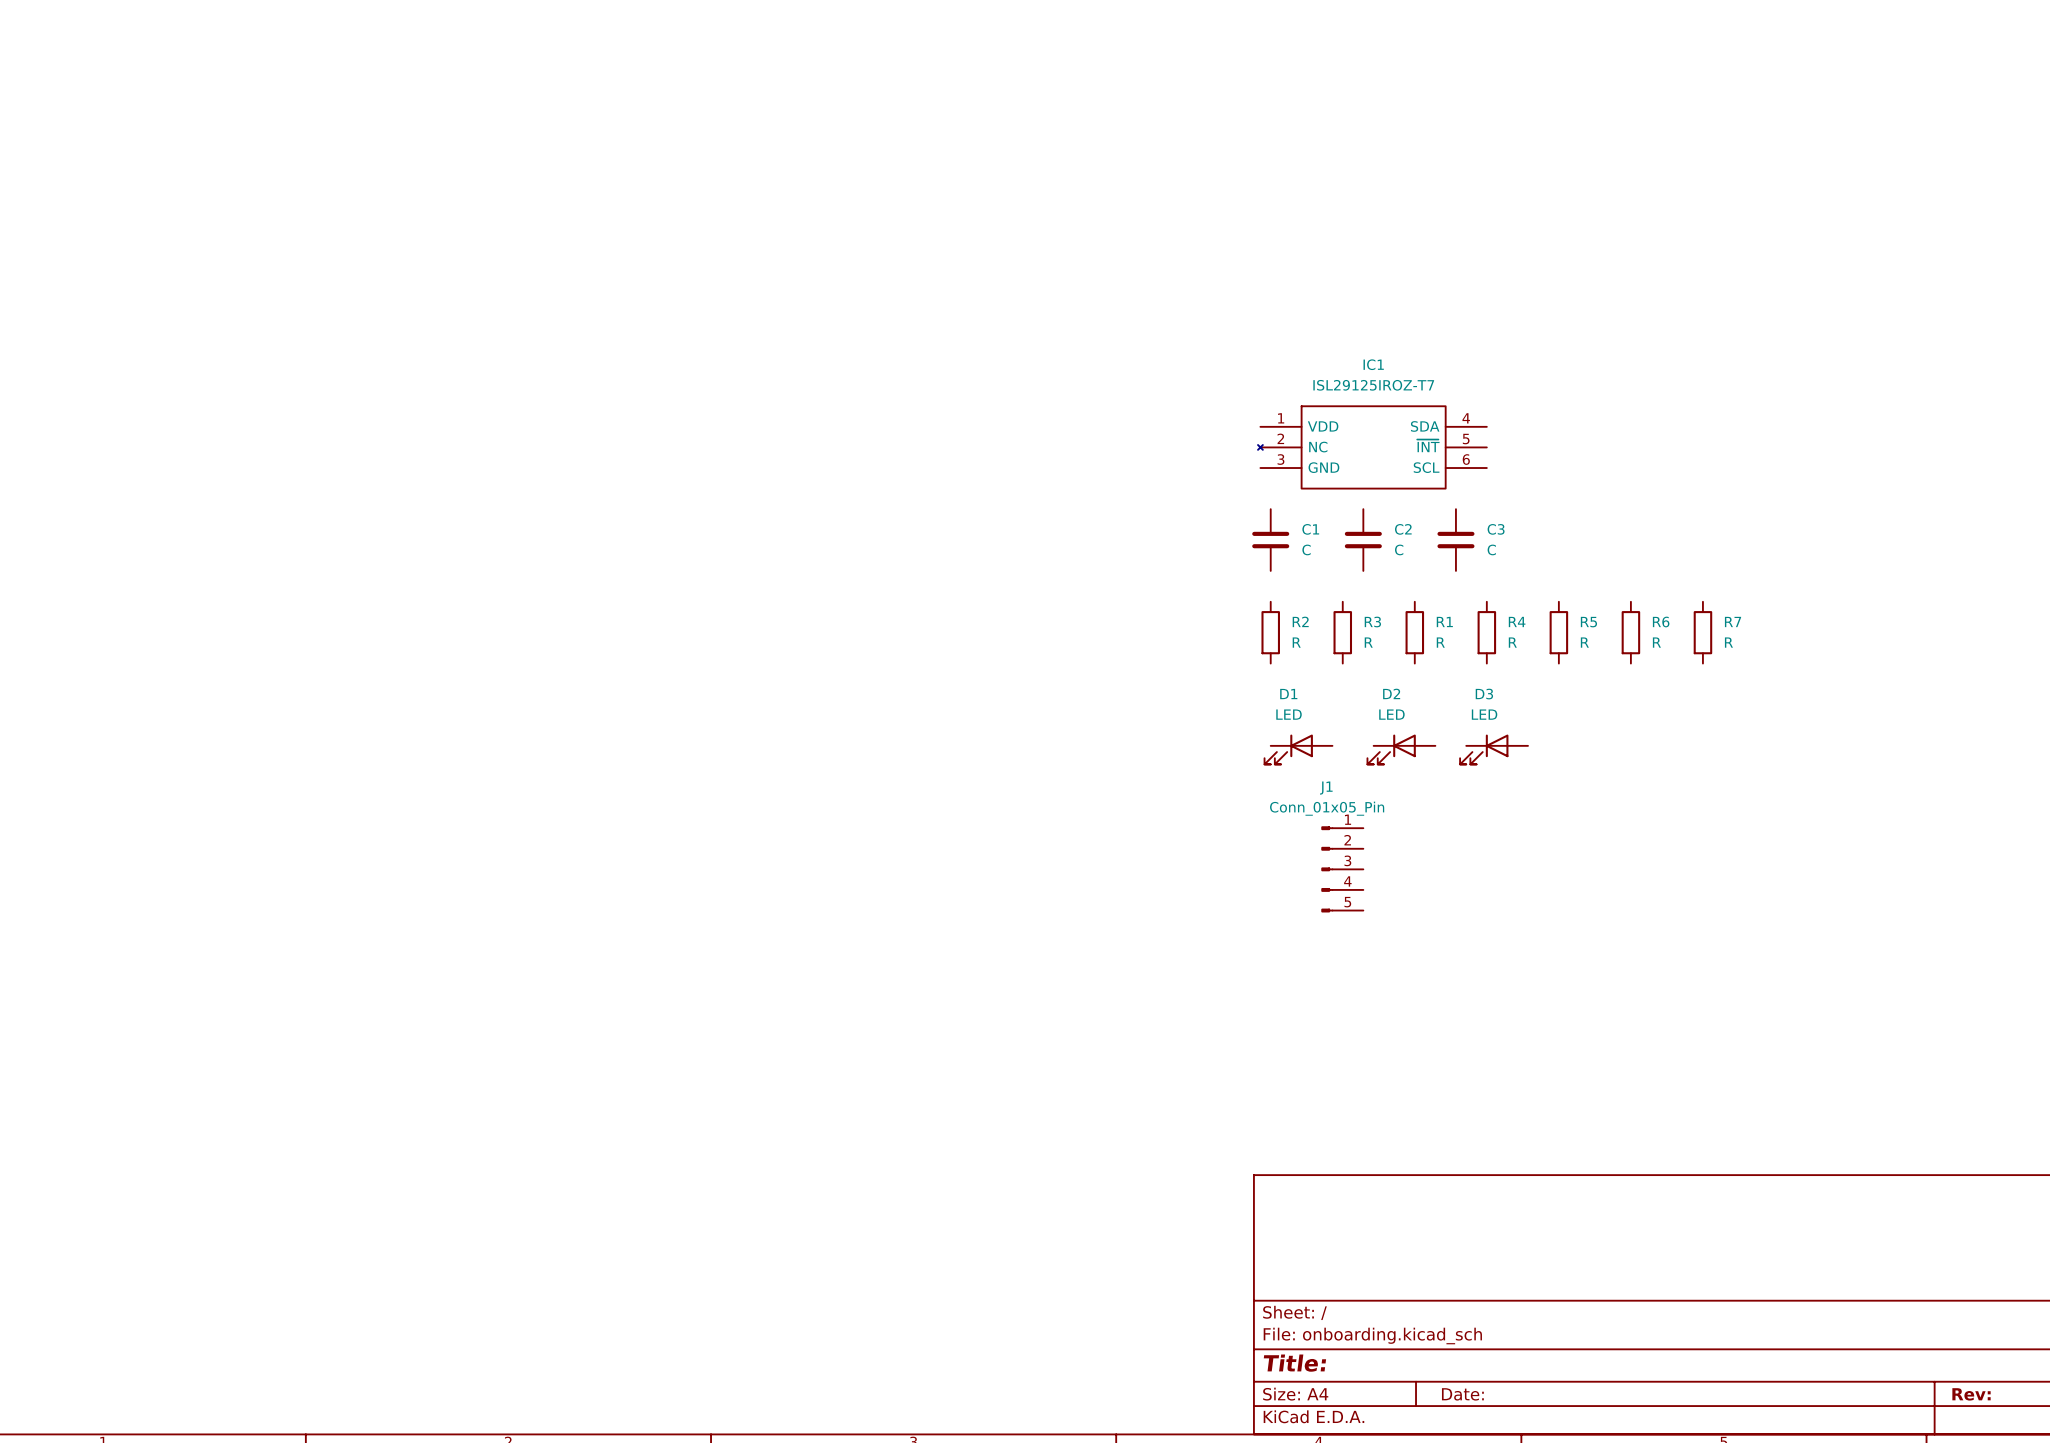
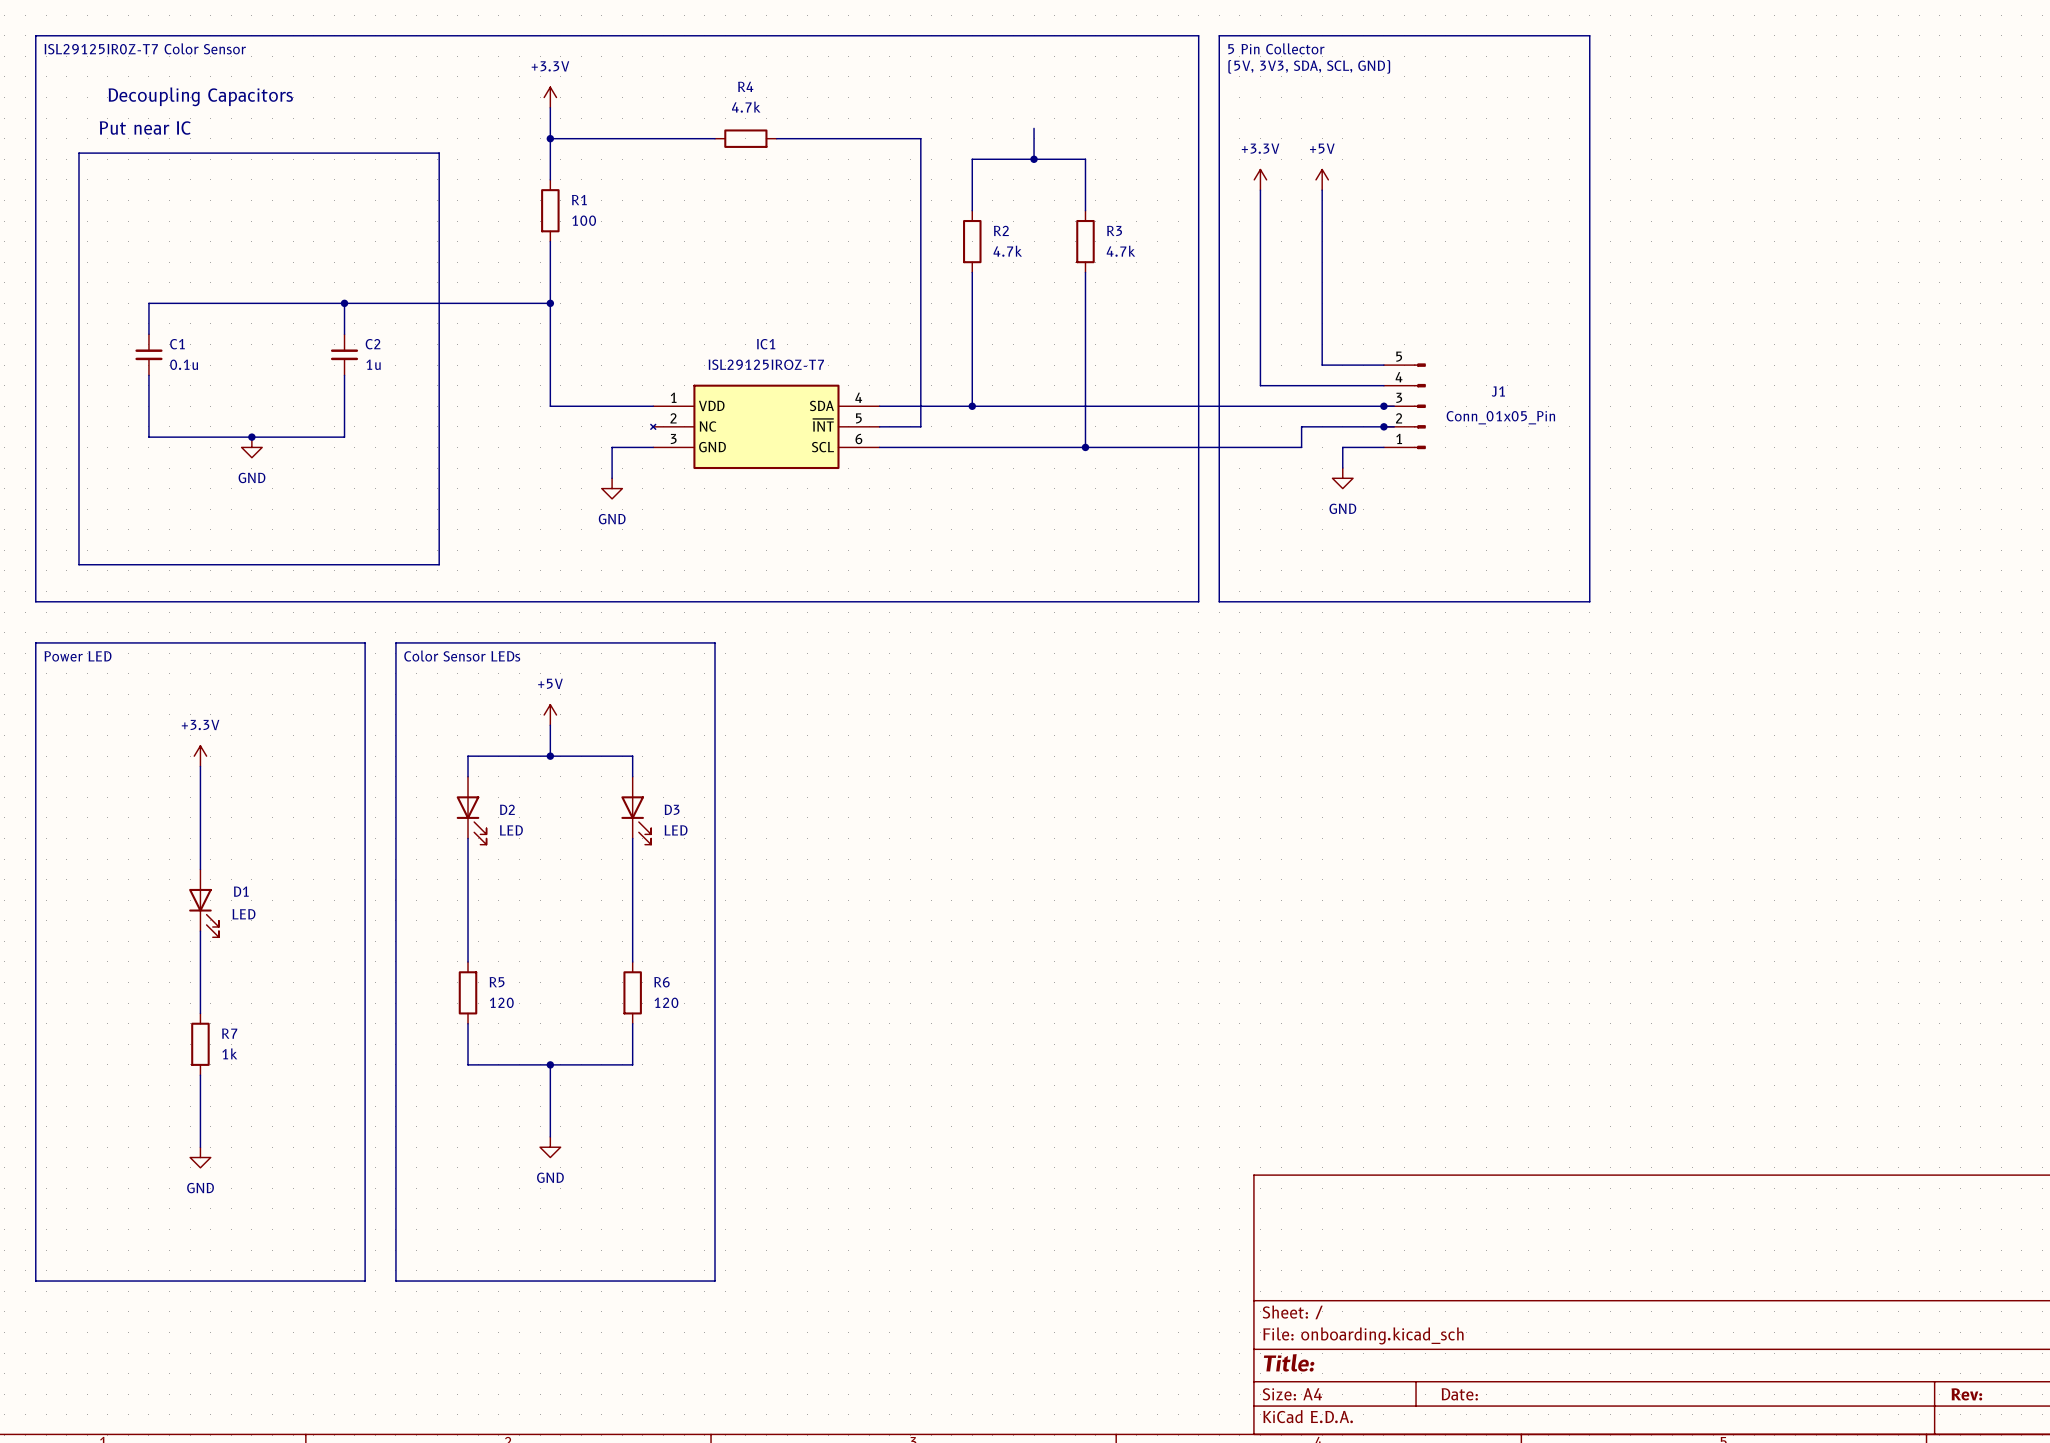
line: none -> (35, 35) (35, 601) (1198, 601) (1198, 35) (35, 35)
line: none -> (1219, 35) (1589, 35) (1589, 601) (1219, 601) (1219, 35)
text: none -> ISL29125IR0Z-T7 Color Sensor (145, 48)
text: none -> 5 Pin Collector (1276, 48)
text: none -> (5V, 3V3, SDA, SCL, GND) (1309, 66)
text: none -> Decoupling Capacitors (200, 96)
power symbol: none -> +3.3V (550, 97)
wire: none -> (550, 107) (550, 179)
text: none -> Put near IC (145, 128)
wire: none -> (1034, 128) (1034, 159)
wire: none -> (550, 138) (714, 138)
junction: none -> (550, 138)
wire: none -> (776, 138) (920, 138) (920, 426) (879, 426)
line: none -> (79, 153) (439, 153) (439, 564) (79, 564) (79, 153)
junction: none -> (1034, 159)
power symbol: none -> +3.3V (1260, 179)
power symbol: none -> +5V (1322, 179)
wire: none -> (1260, 190) (1260, 385) (1383, 385)
wire: none -> (1322, 190) (1322, 365) (1383, 365)
wire: none -> (972, 210) (972, 159) (1085, 159) (1085, 210)
wire: none -> (550, 241) (550, 406) (653, 406)
wire: none -> (972, 272) (972, 406)
wire: none -> (1085, 272) (1085, 447)
wire: none -> (344, 303) (344, 334)
junction: none -> (344, 303)
wire: none -> (550, 303) (148, 303) (148, 334)
junction: none -> (550, 303)
wire: none -> (148, 375) (148, 437) (344, 437) (344, 375)
IC1 symbol: [1258, 405, 1487, 490] -> [650, 384, 880, 470]
wire: none -> (879, 406) (1394, 406)
junction: none -> (972, 406)
junction: none -> (1383, 406)
junction: none -> (1383, 426)
wire: none -> (1394, 426) (1301, 426) (1301, 447) (879, 447)
junction: none -> (251, 437)
power symbol: none -> GND (251, 447)
wire: none -> (653, 447) (612, 447) (612, 478)
junction: none -> (1085, 447)
wire: none -> (1383, 447) (1342, 447) (1342, 468)
power symbol: none -> GND (1342, 478)
power symbol: none -> GND (612, 488)
C1 symbol: [1252, 509, 1290, 571] -> [135, 334, 163, 376]
C2 symbol: [1344, 509, 1382, 571] -> [330, 334, 359, 376]
C3: C (1455, 540) -> none
C1 value: C (1306, 549) -> 0.1u (184, 364)
C2 value: C (1399, 549) -> 1u (373, 364)
R4 name position: R4 (1517, 621) -> R4 (745, 86)
R2 position: (1270, 632) -> (972, 241)
R3 position: (1342, 632) -> (1085, 241)
R1 position: (1414, 632) -> (550, 210)
R4 rotation: 0° (1486, 632) -> 90° clockwise (745, 138)
R4 position: (1486, 632) -> (745, 138)
R5 position: (1558, 632) -> (468, 992)
R6 position: (1630, 632) -> (632, 992)
R7 position: (1702, 632) -> (200, 1044)
line: none -> (35, 642) (365, 642) (365, 1281) (35, 1281) (35, 642)
line: none -> (395, 642) (714, 642) (714, 1281) (395, 1281) (395, 642)
R2 value: R (1296, 642) -> 4.7k (1007, 251)
R3 value: R (1368, 642) -> 4.7k (1120, 251)
R1 value: R (1440, 642) -> 100 (584, 220)
R4 value: R (1512, 642) -> 4.7k (746, 107)
R5 value: R (1584, 642) -> 120 (501, 1002)
R6 value: R (1656, 642) -> 120 (666, 1002)
R7 value: R (1728, 642) -> 1k (229, 1053)
text: none -> Power LED (78, 656)
text: none -> Color Sensor LEDs (462, 656)
D2 name position: D2 (1391, 693) -> D2 (507, 809)
D1 name position: D1 (1288, 694) -> D1 (241, 891)
D3 name position: D3 (1484, 694) -> D3 (672, 809)
power symbol: none -> +5V (550, 714)
D1 value position: LED (1289, 714) -> LED (243, 914)
D2 value position: LED (1391, 714) -> LED (511, 830)
D3 value position: LED (1484, 714) -> LED (676, 830)
wire: none -> (550, 725) (550, 756)
D1 rotation: 0° (1288, 749) -> 90° counterclockwise (204, 913)
D1 position: (1298, 749) -> (204, 903)
D2 rotation: 0° (1391, 749) -> 90° counterclockwise (471, 820)
D2 position: (1401, 749) -> (471, 810)
D3 rotation: 0° (1484, 749) -> 90° counterclockwise (636, 820)
D3 position: (1494, 749) -> (636, 810)
power symbol: none -> +3.3V (200, 756)
junction: none -> (550, 756)
wire: none -> (200, 766) (200, 869)
wire: none -> (468, 776) (468, 756) (632, 756) (632, 776)
J1 name position: J1 (1326, 788) -> J1 (1498, 391)
J1 value position: Conn_01x05_Pin (1327, 808) -> Conn_01x05_Pin (1500, 417)
wire: none -> (468, 838) (468, 961)
wire: none -> (632, 838) (632, 961)
J1 rotation: 0° (1327, 869) -> 180° (1419, 406)
J1 position: (1342, 869) -> (1404, 406)
wire: none -> (200, 931) (200, 1013)
wire: none -> (468, 1023) (468, 1064) (632, 1064) (632, 1023)
wire: none -> (550, 1064) (550, 1136)
junction: none -> (550, 1064)
wire: none -> (200, 1075) (200, 1147)
power symbol: none -> GND (550, 1147)
power symbol: none -> GND (200, 1157)

